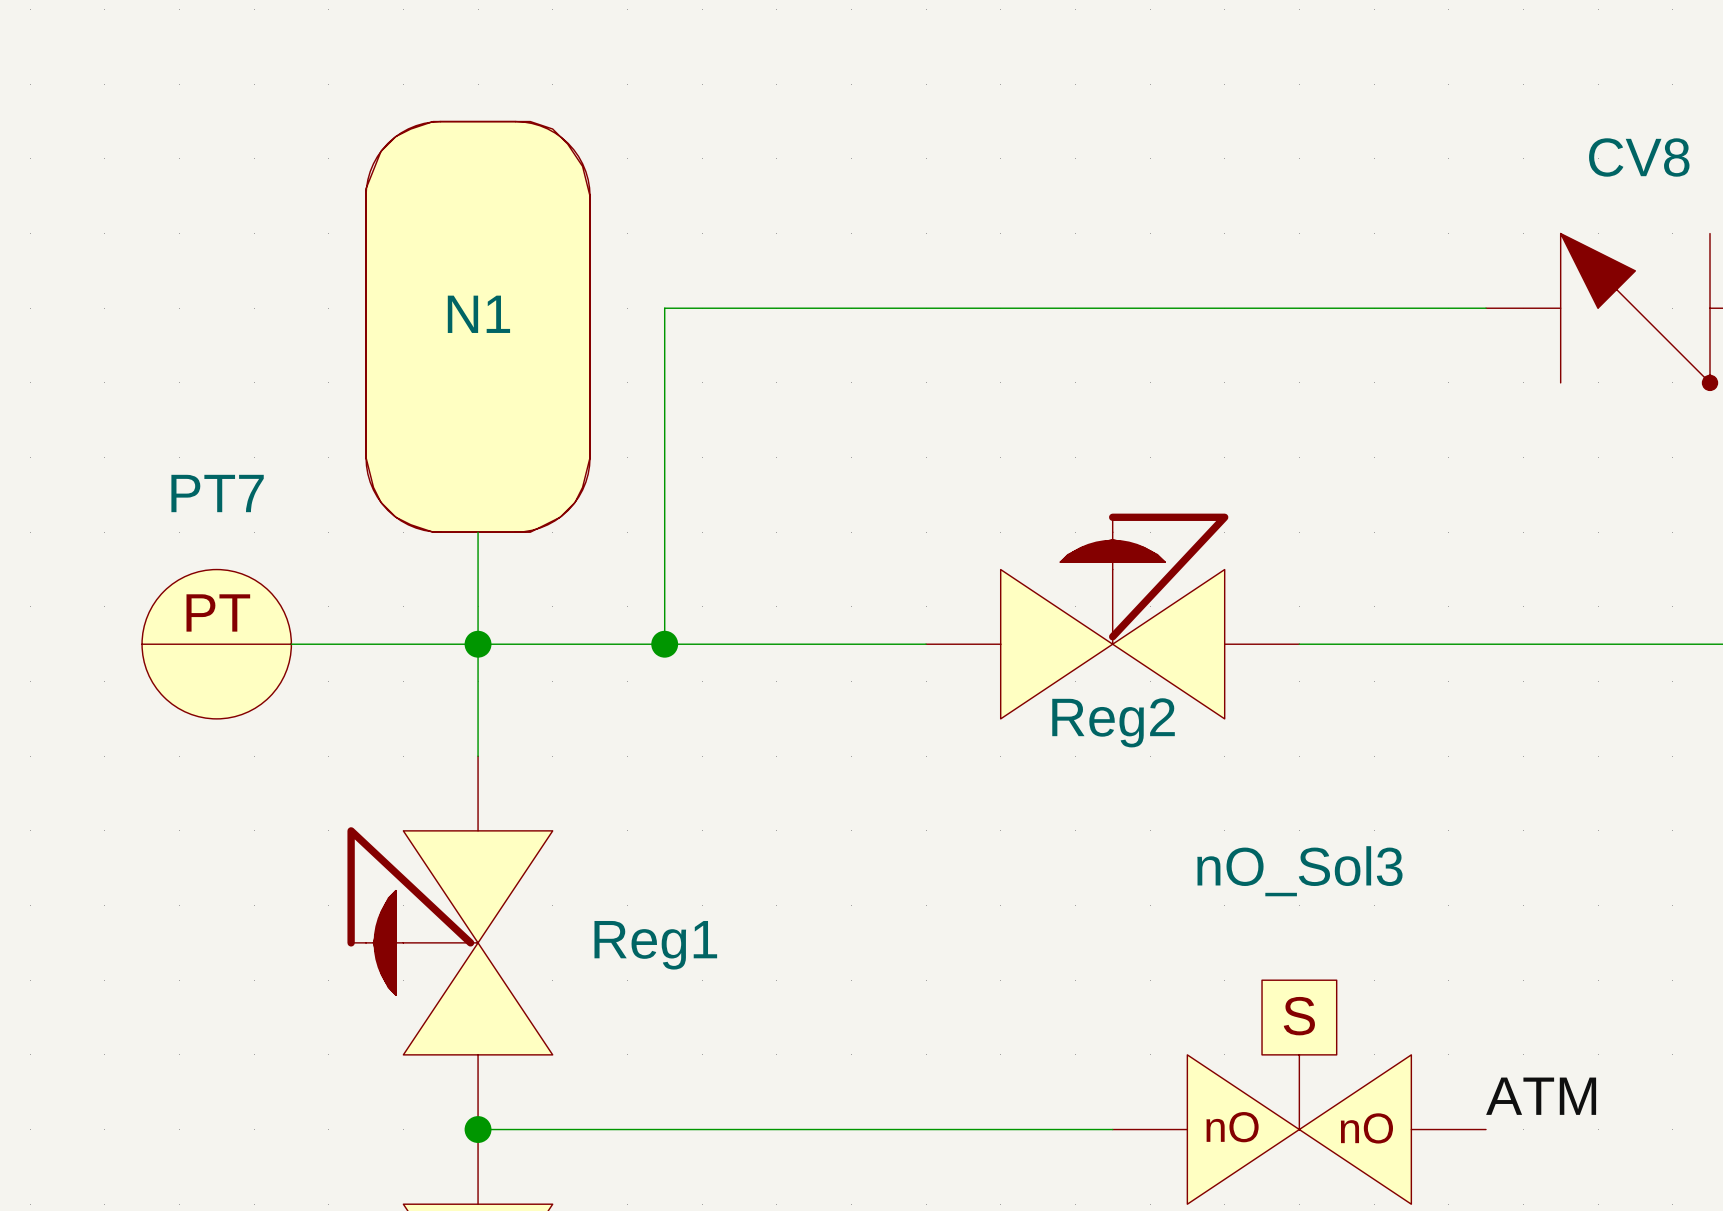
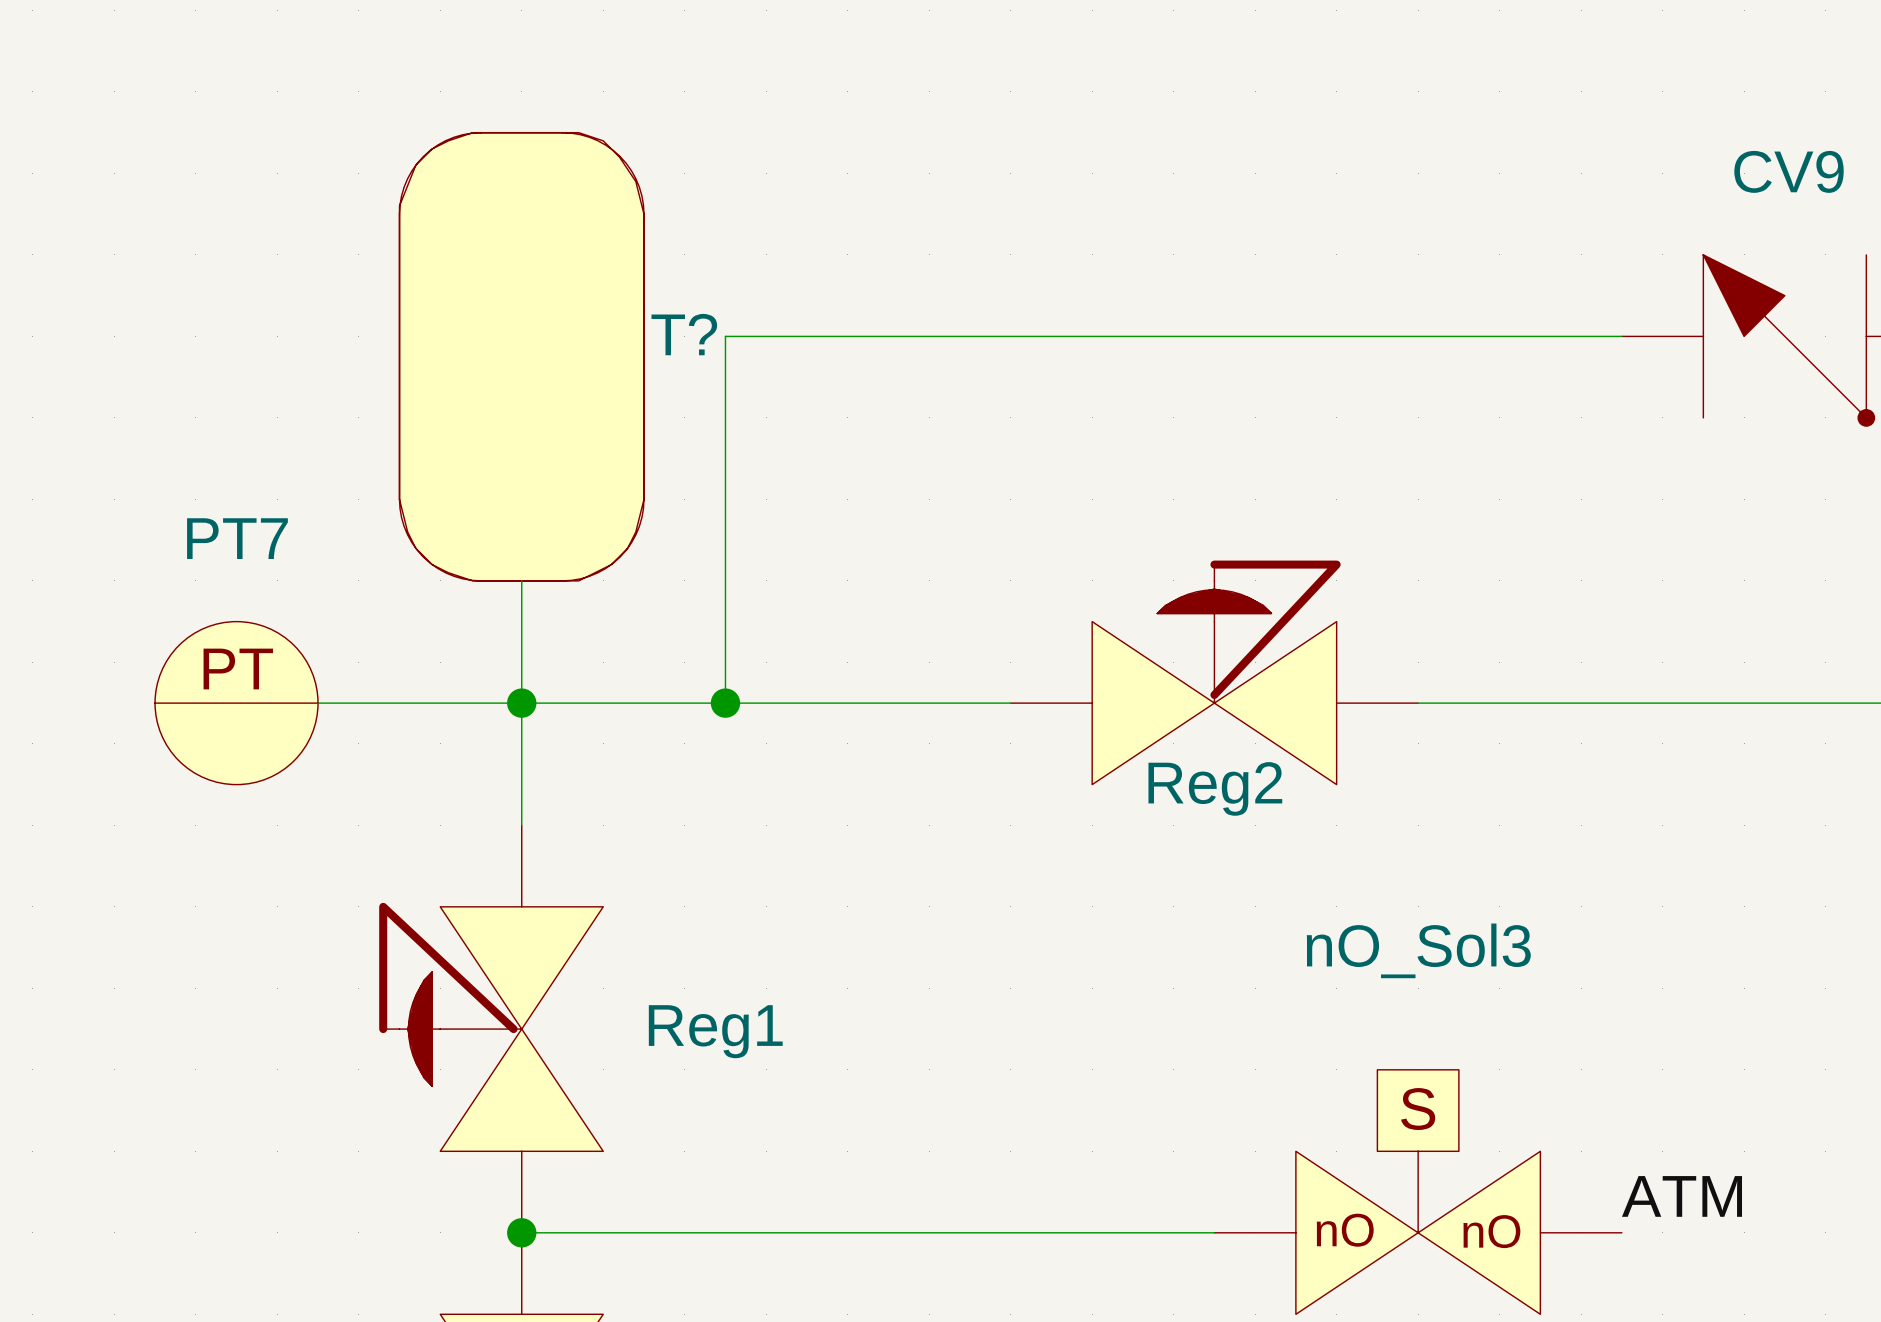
CV8 name: CV8 (1639, 157) -> CV9 (1789, 171)
N1 name: N1 (478, 314) -> T? (684, 334)

